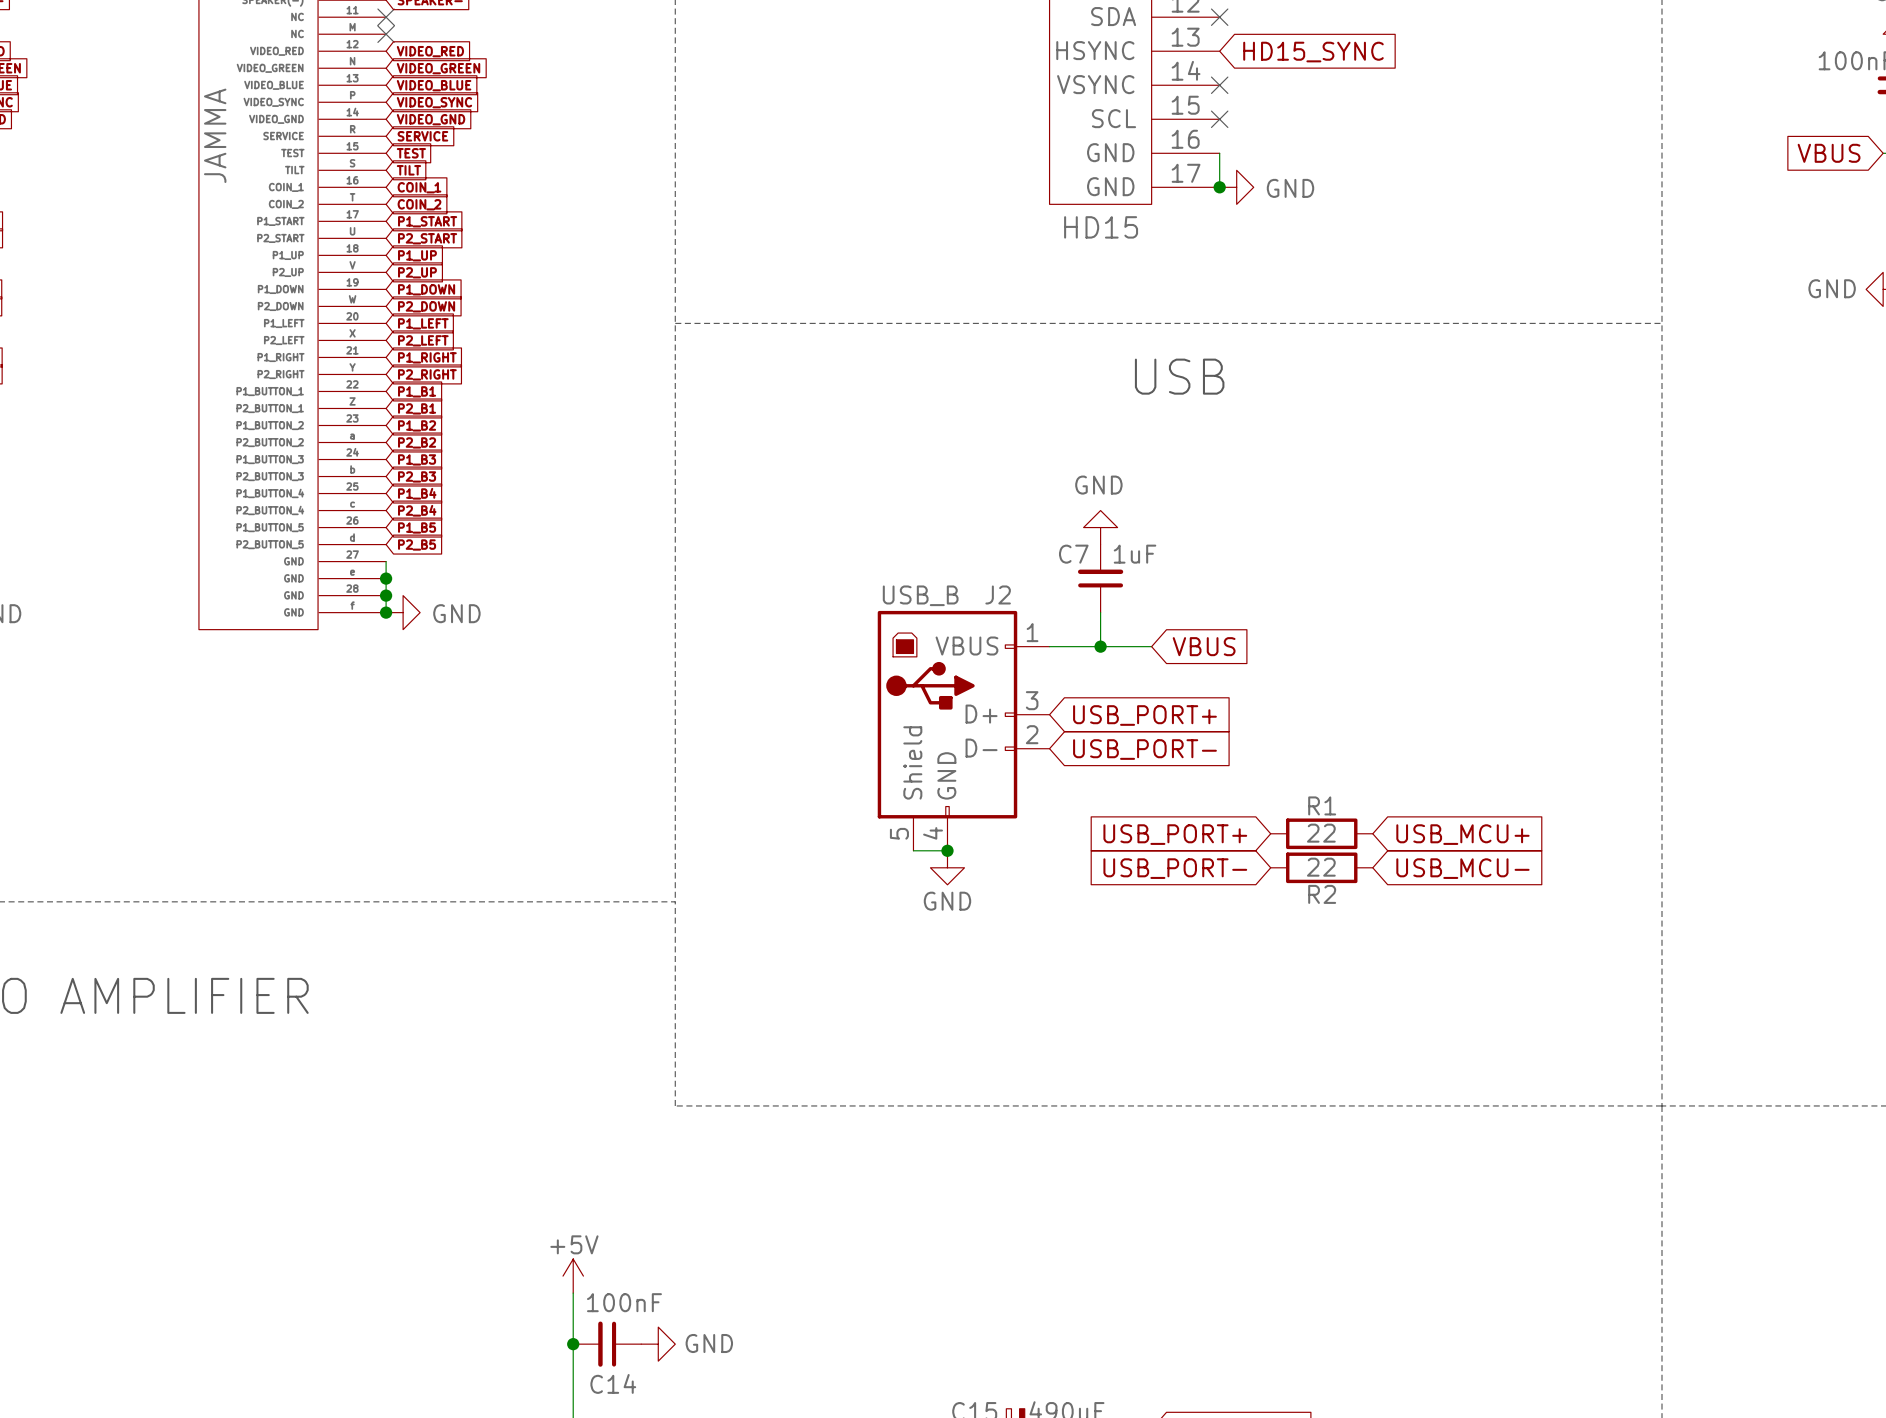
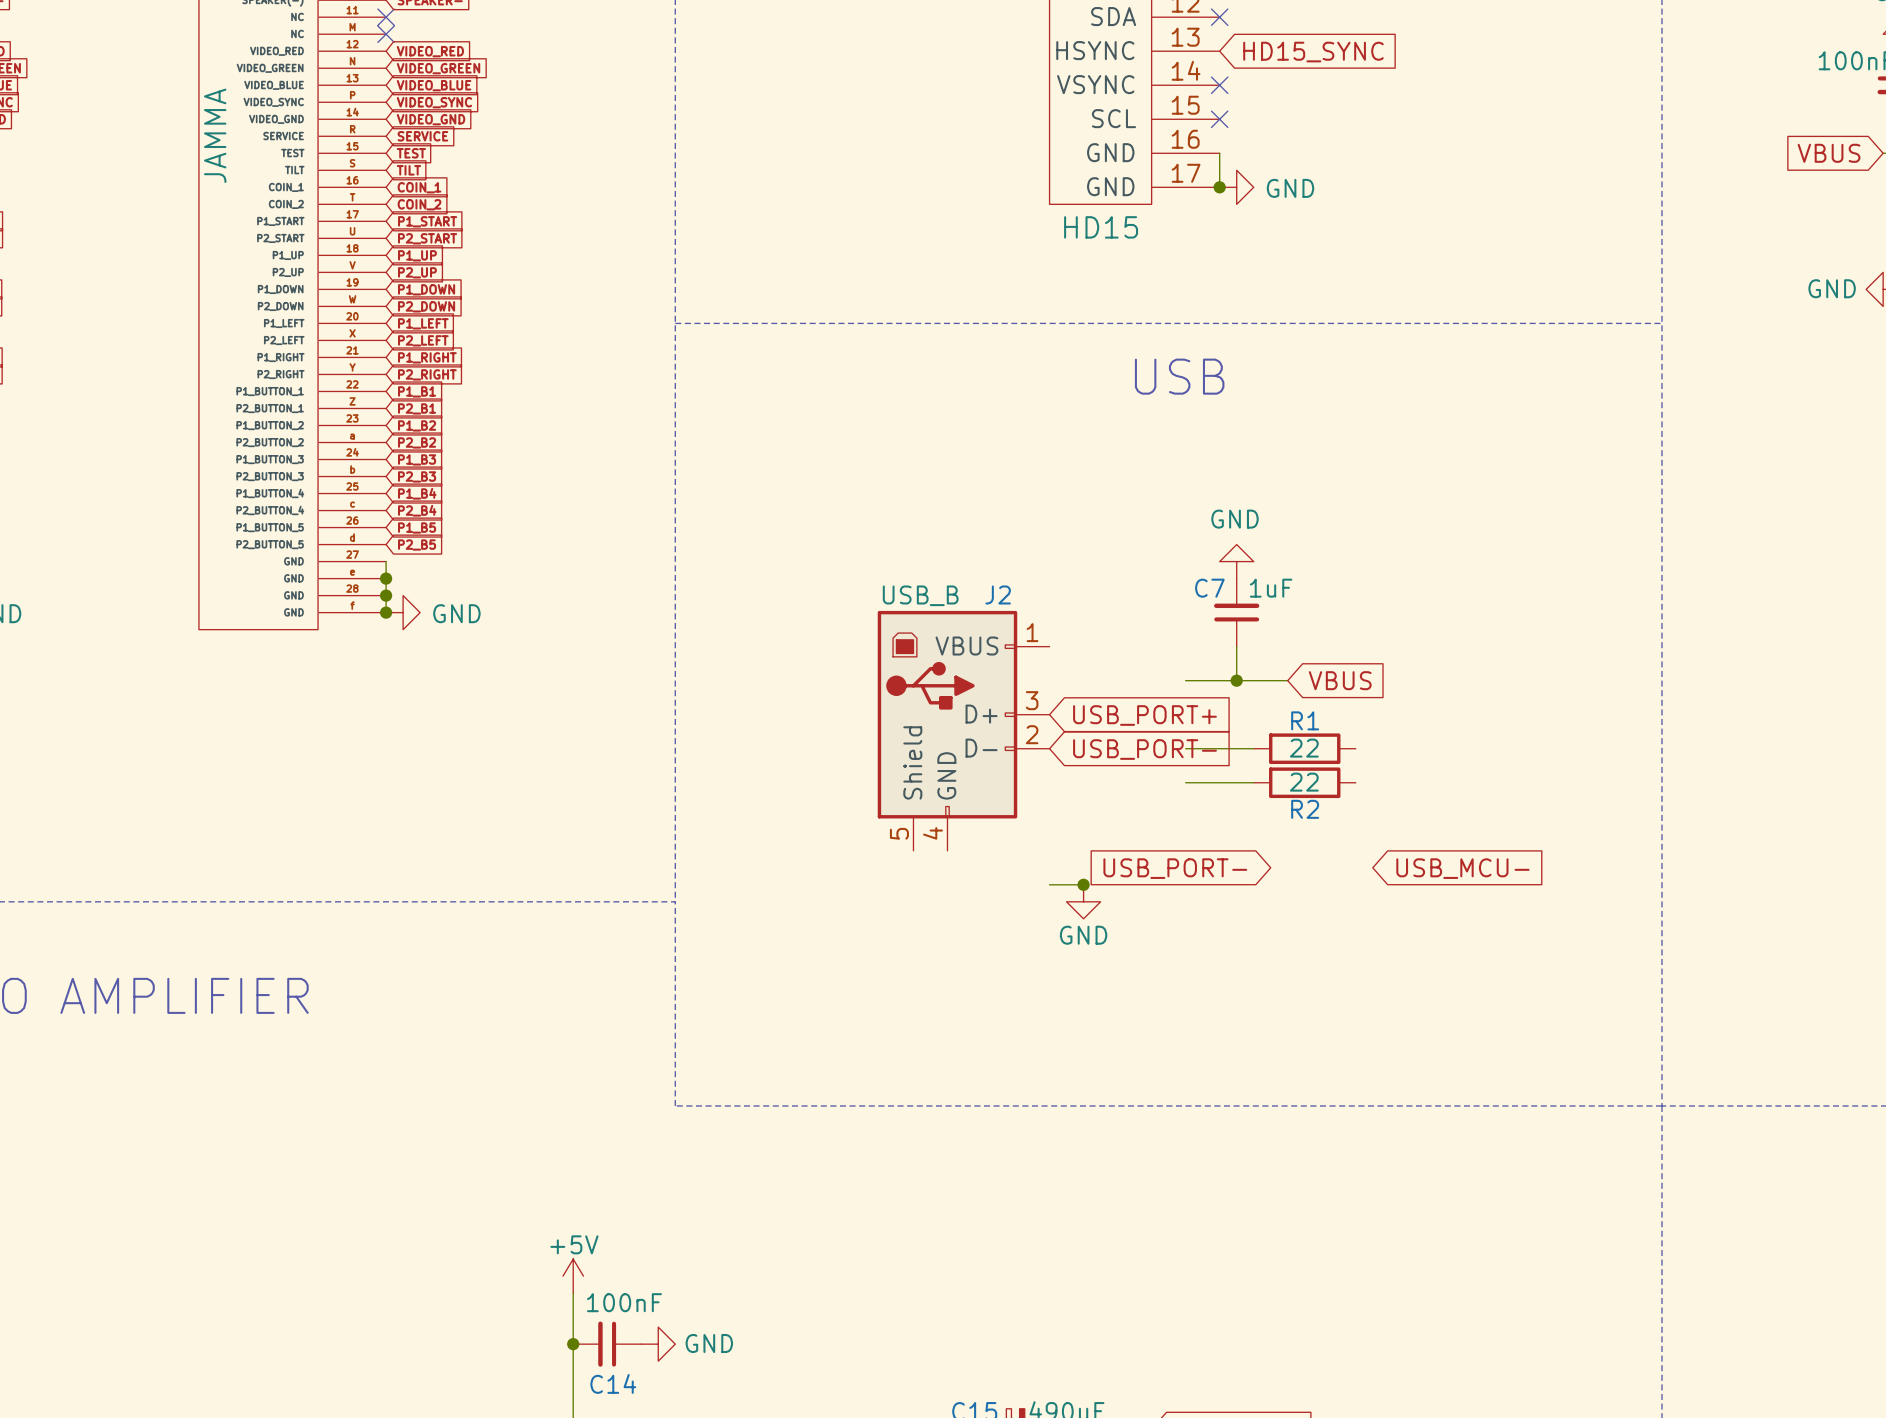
power symbol position: GND (1100, 527) -> GND (1236, 561)
C7 position: (1100, 578) -> (1236, 612)
wire: (1100, 612) (1100, 646) -> (1236, 646) (1236, 680)
wire: (1049, 646) (1151, 646) -> (1185, 680) (1287, 680)
junction: (1100, 646) -> none
global label position: VBUS (1204, 646) -> VBUS (1340, 680)
junction: none -> (1236, 680)
wire: none -> (1185, 748) (1253, 748)
wire: none -> (1185, 782) (1253, 782)
R1 position: (1321, 833) -> (1304, 748)
global label: USB_PORT+ (1175, 834) -> none
global label: USB_MCU+ (1462, 834) -> none
wire: (913, 850) (947, 850) -> (1049, 884) (1083, 884)
junction: (947, 850) -> none
power symbol position: GND (947, 867) -> GND (1083, 901)
R2 position: (1321, 867) -> (1304, 782)
junction: none -> (1083, 884)

